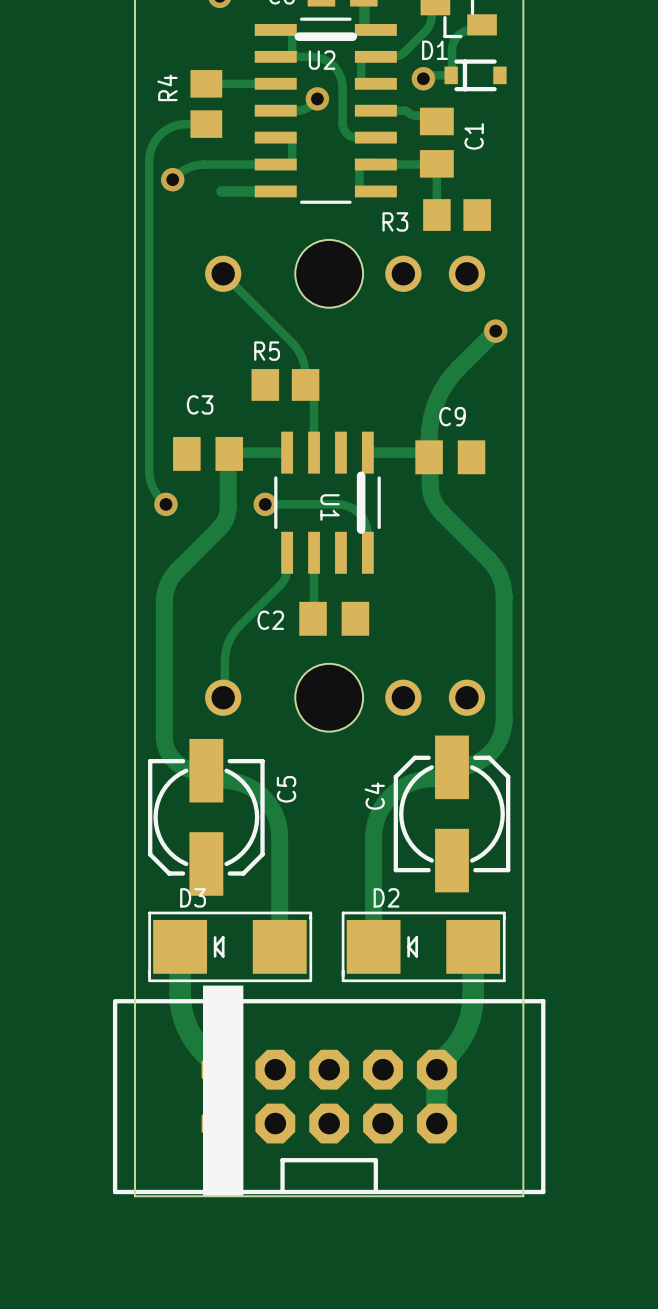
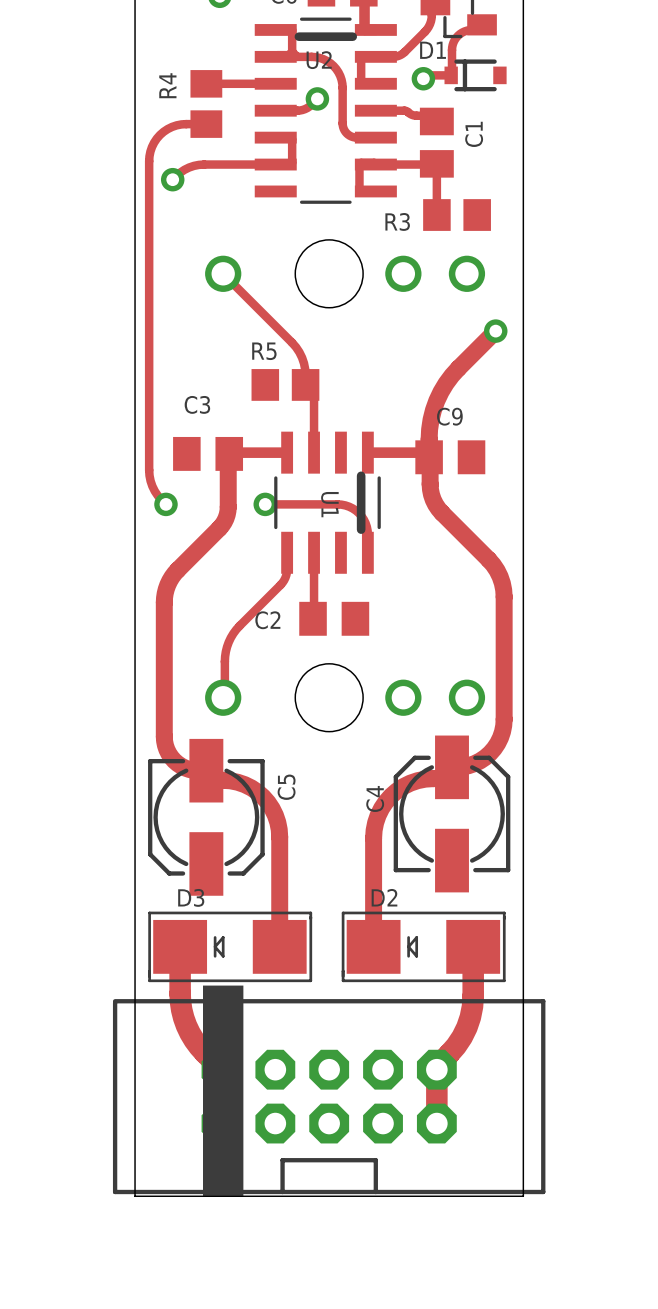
track: (221, 191) (275, 191) -> none

